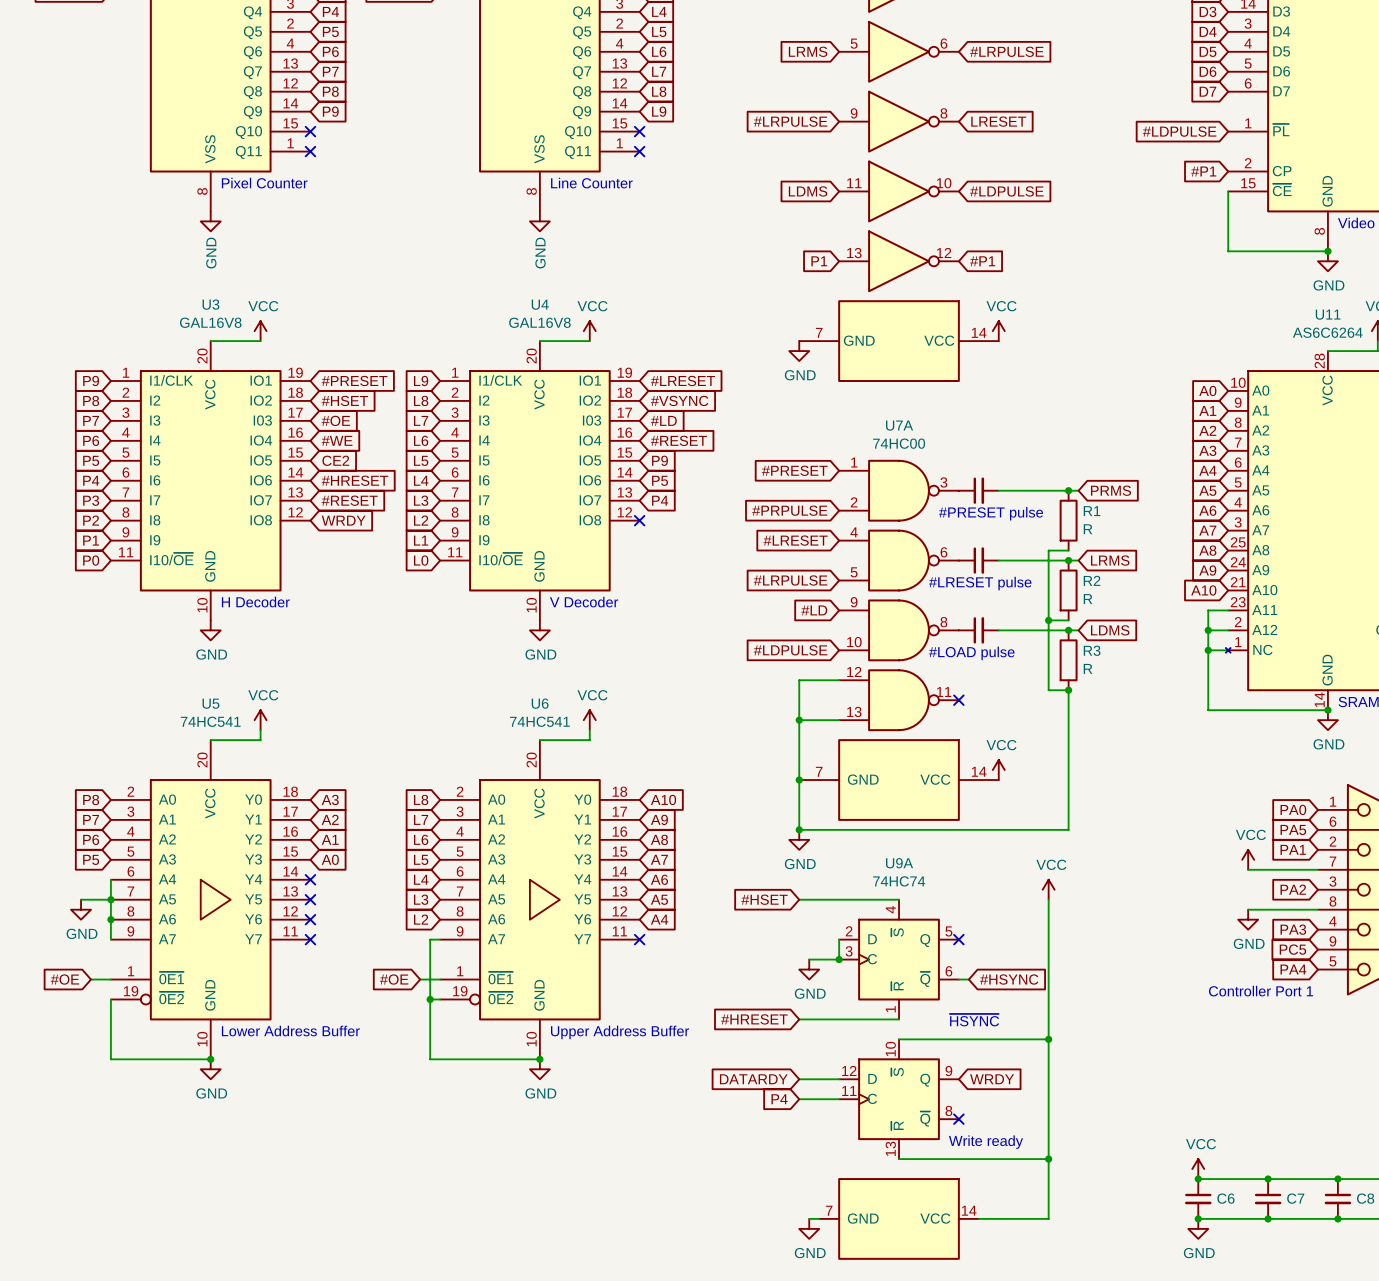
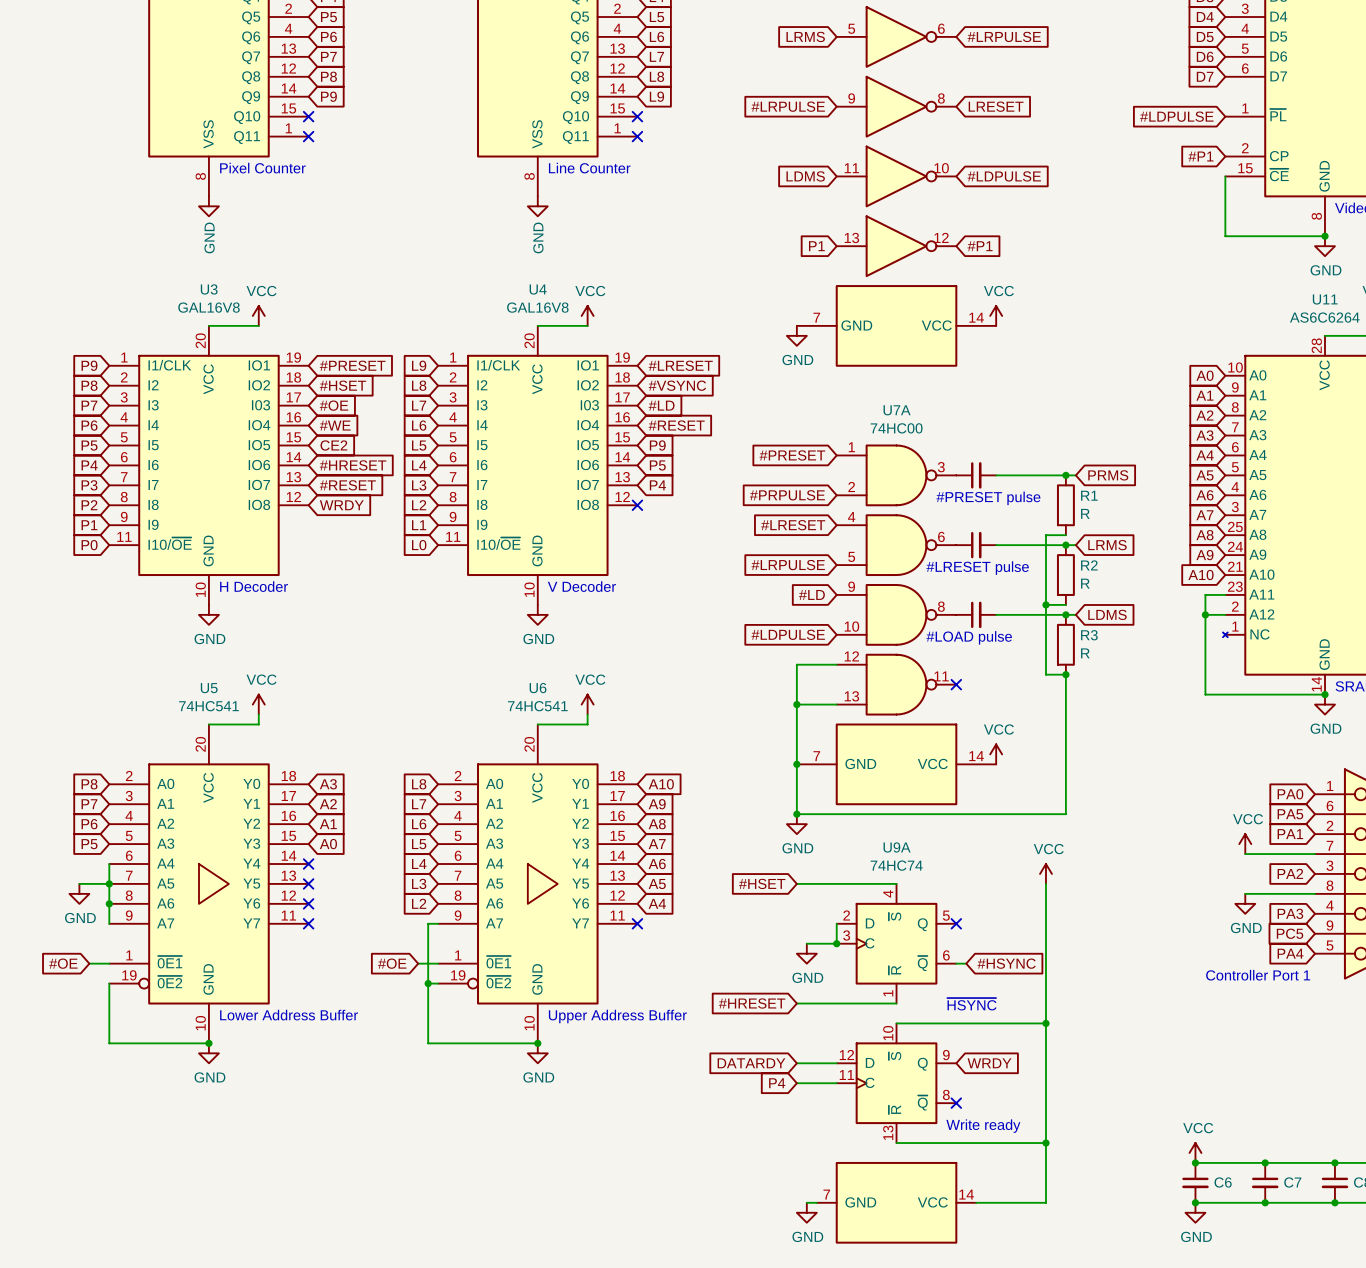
wire: (1208, 650) (1228, 650) -> none
junction: (1208, 650) -> none

